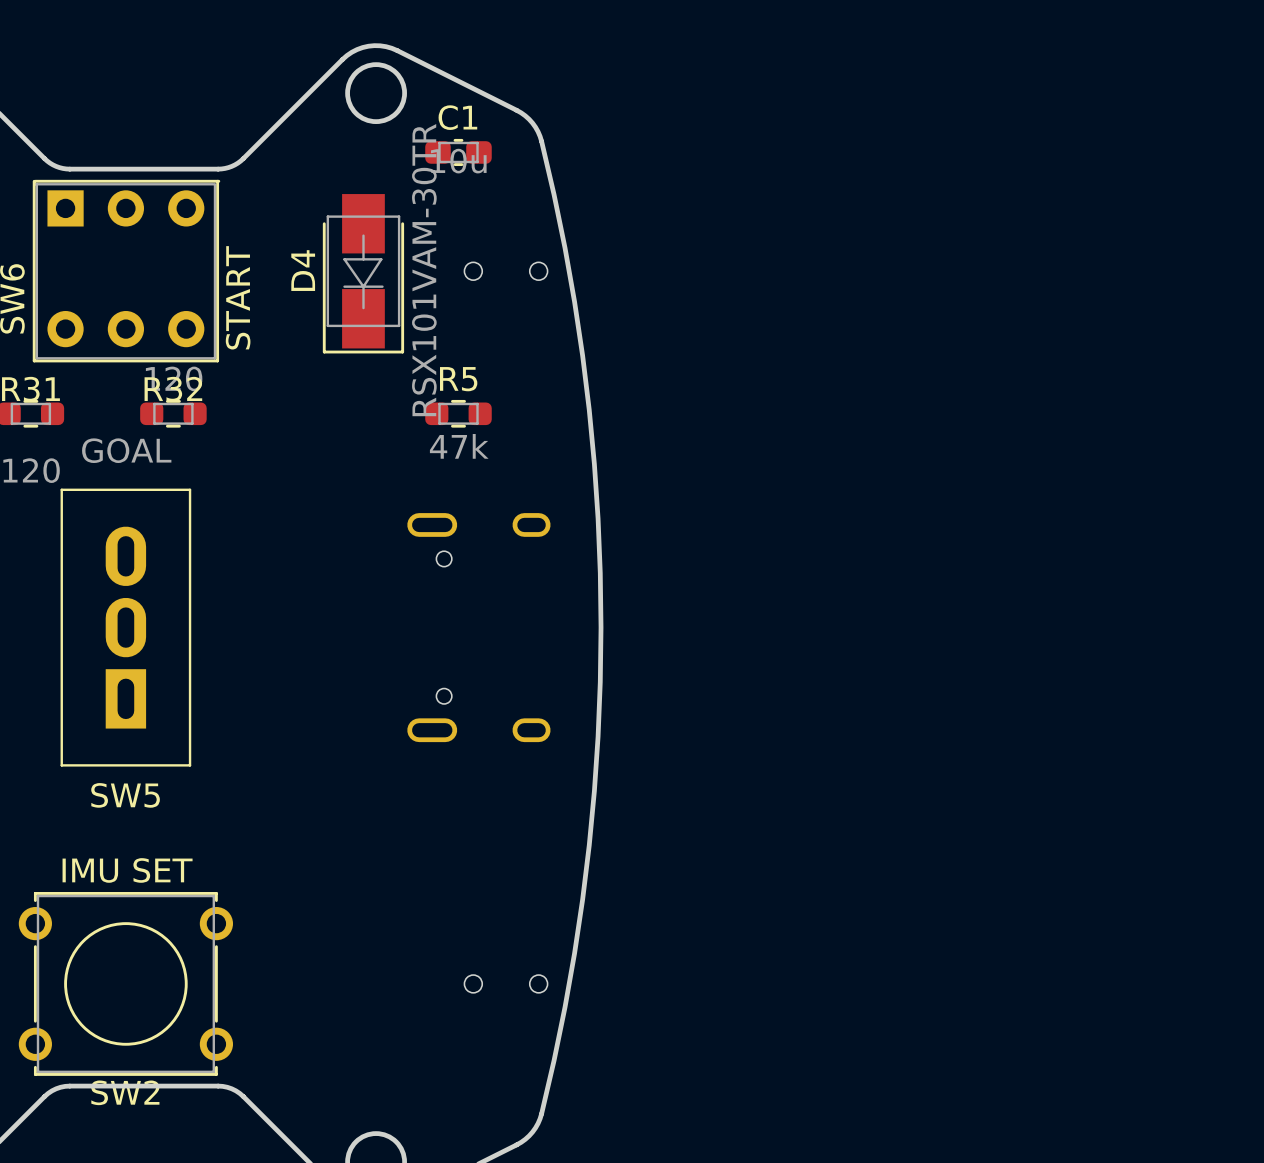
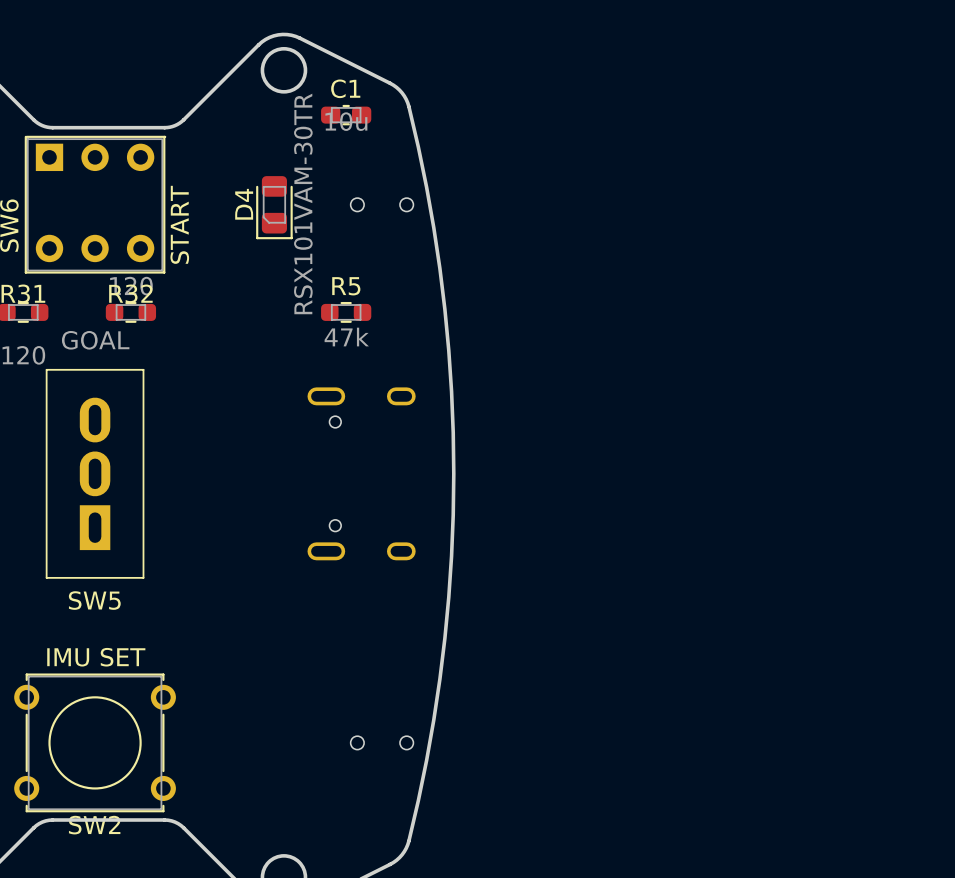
D4 footprint: [322, 194, 405, 354] -> [256, 176, 293, 240]

